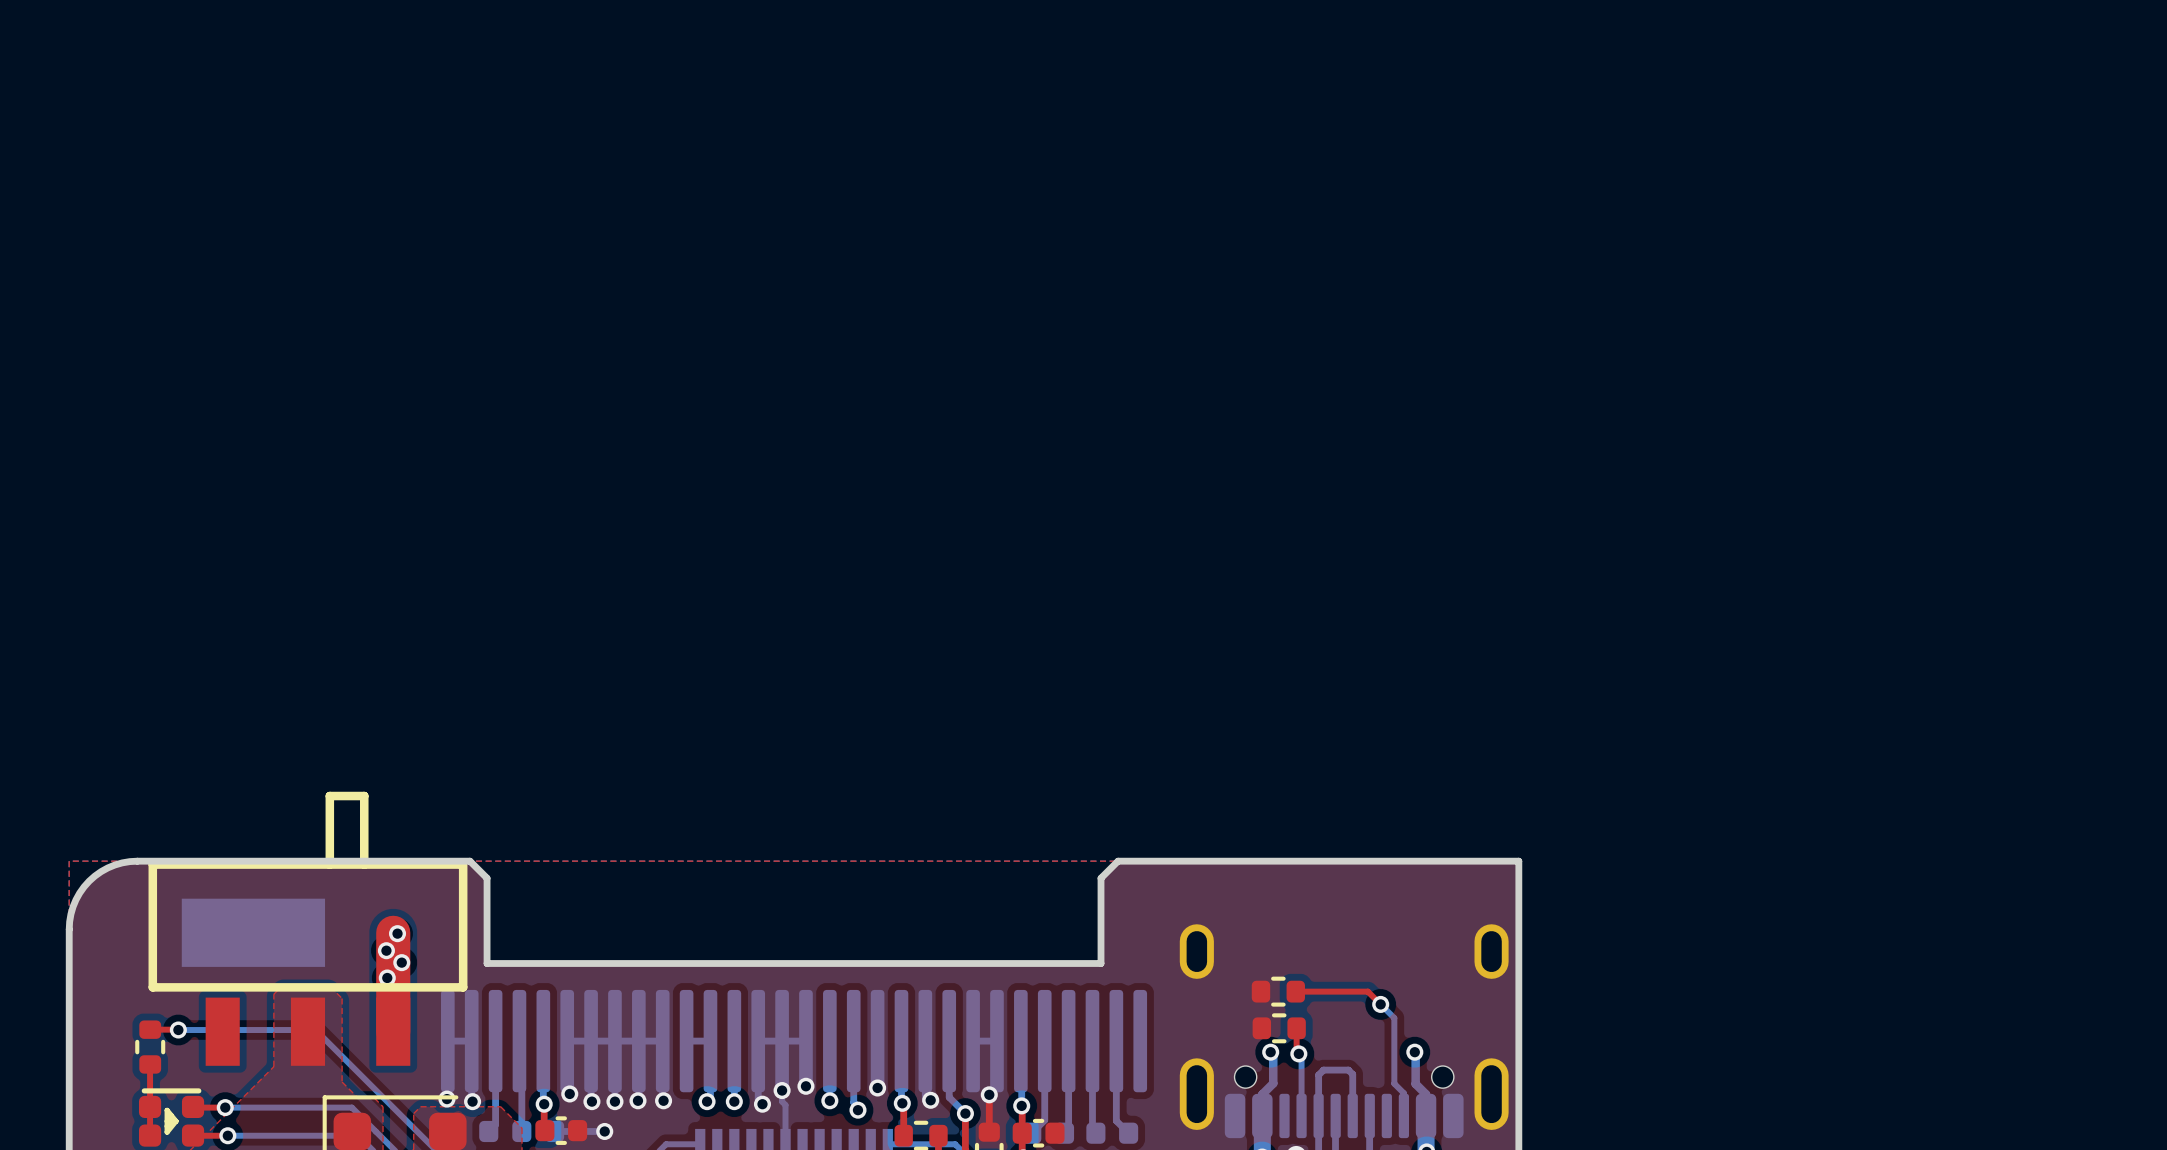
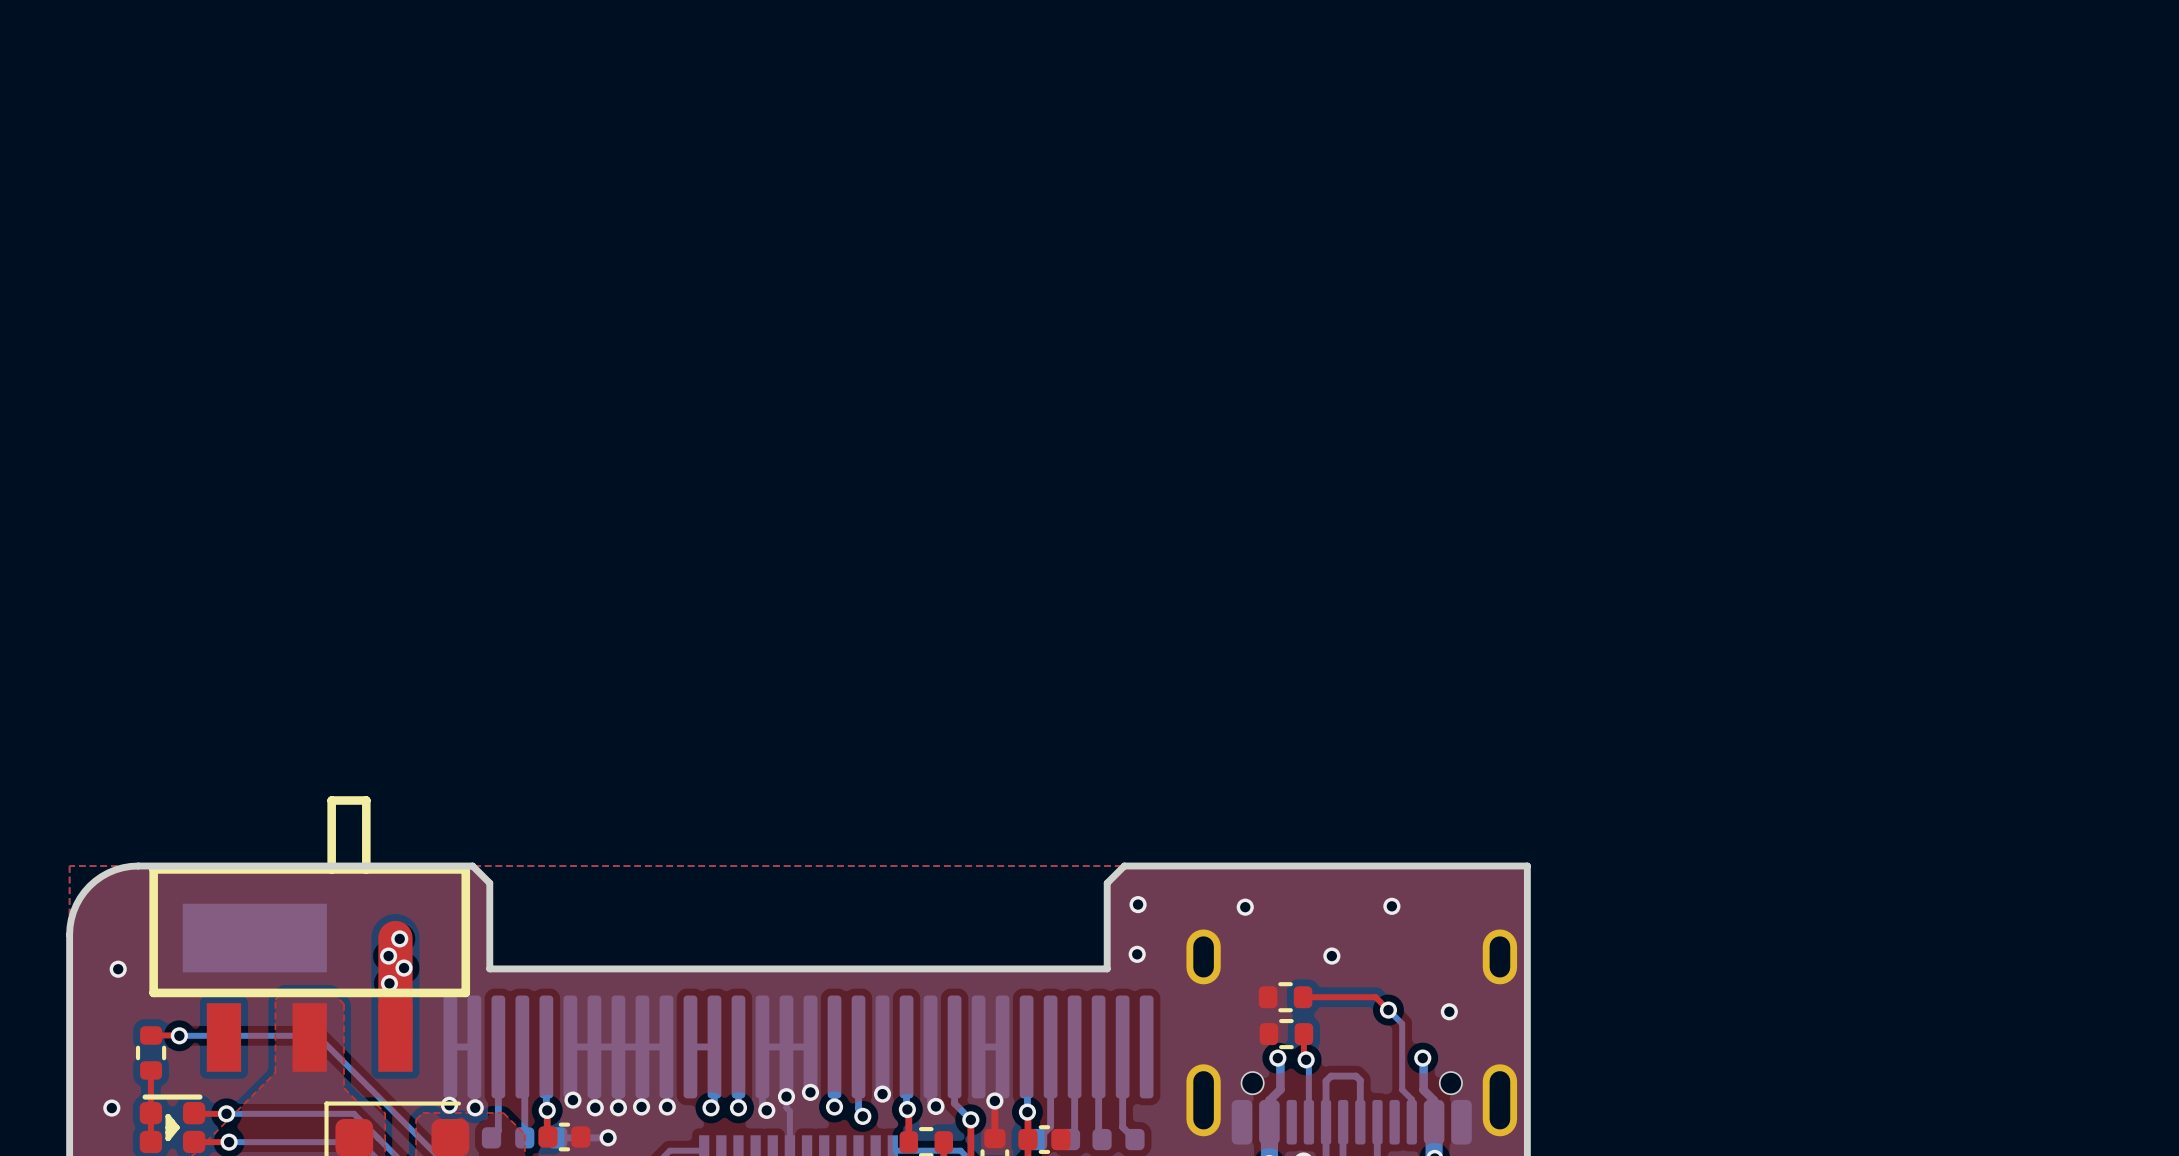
via: none -> (1138, 904)
via: none -> (1391, 906)
via: none -> (1245, 907)
via: none -> (1137, 954)
via: none -> (1331, 956)
via: none -> (118, 969)
via: none -> (1449, 1011)
via: none -> (111, 1108)

